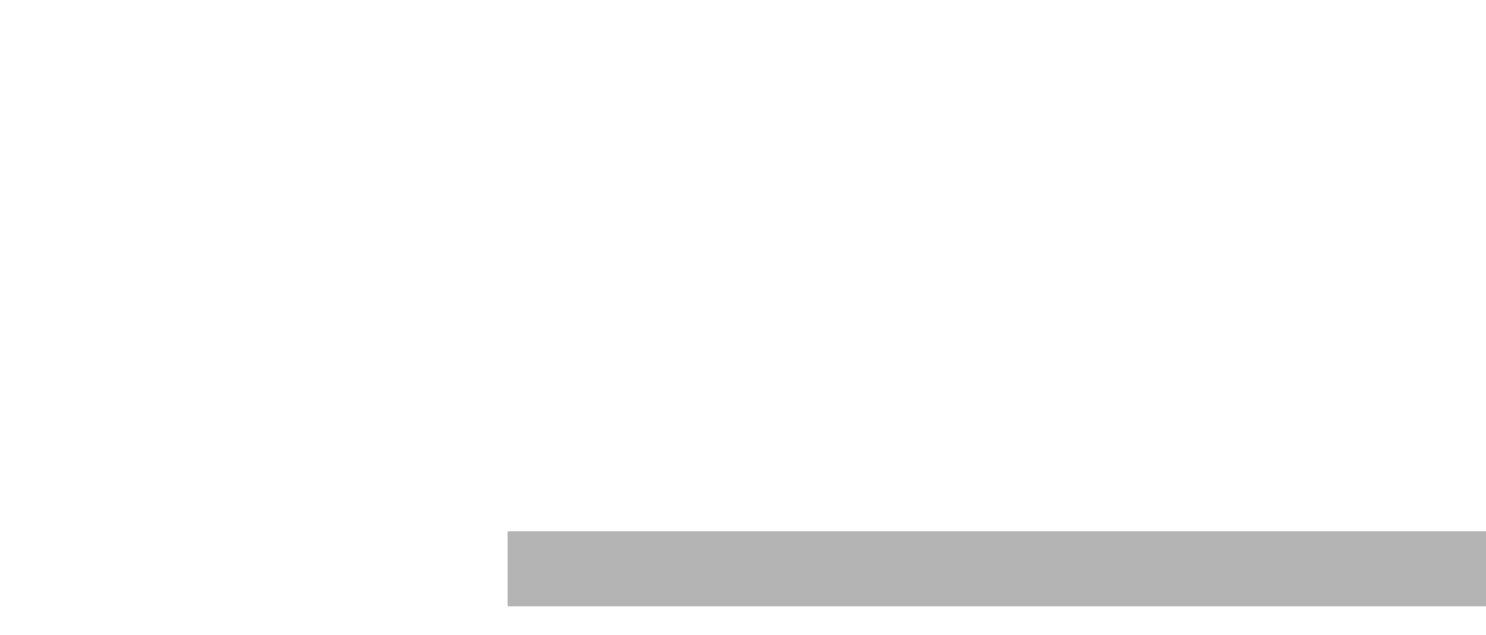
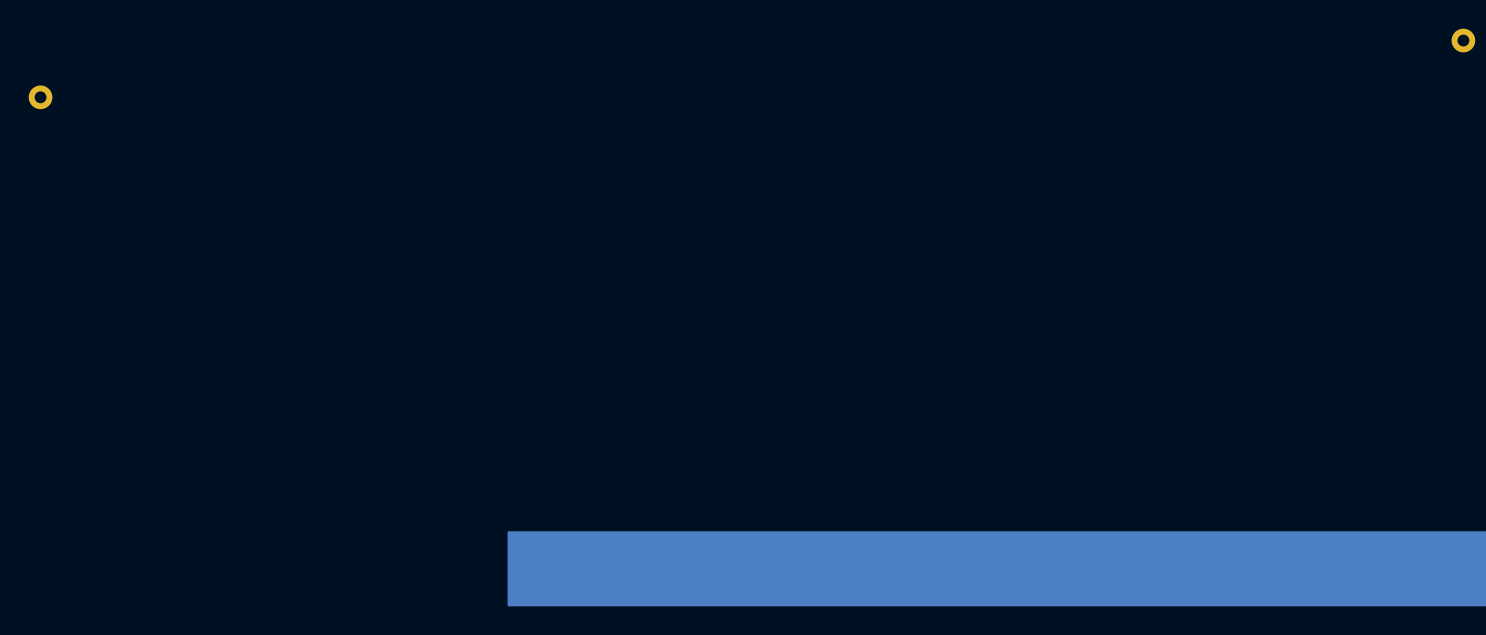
part: none -> (1463, 40)
part: none -> (40, 97)

